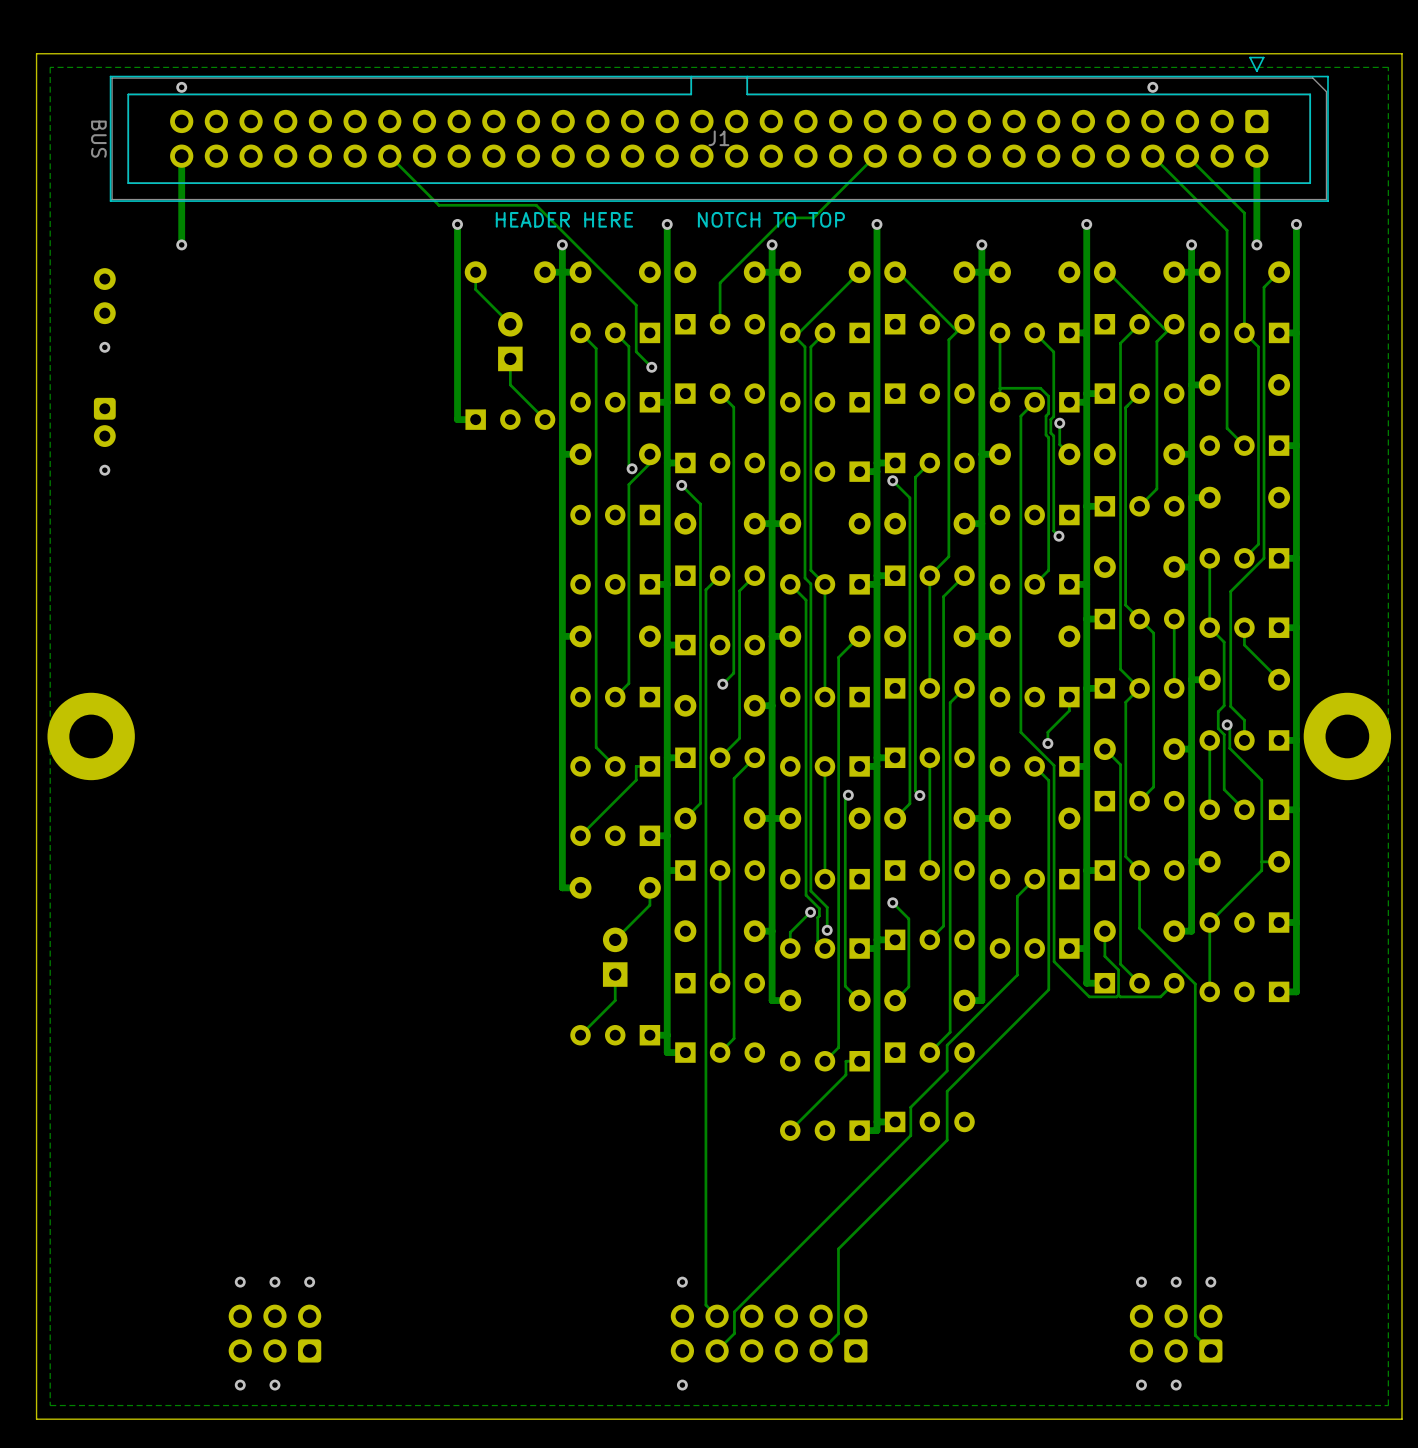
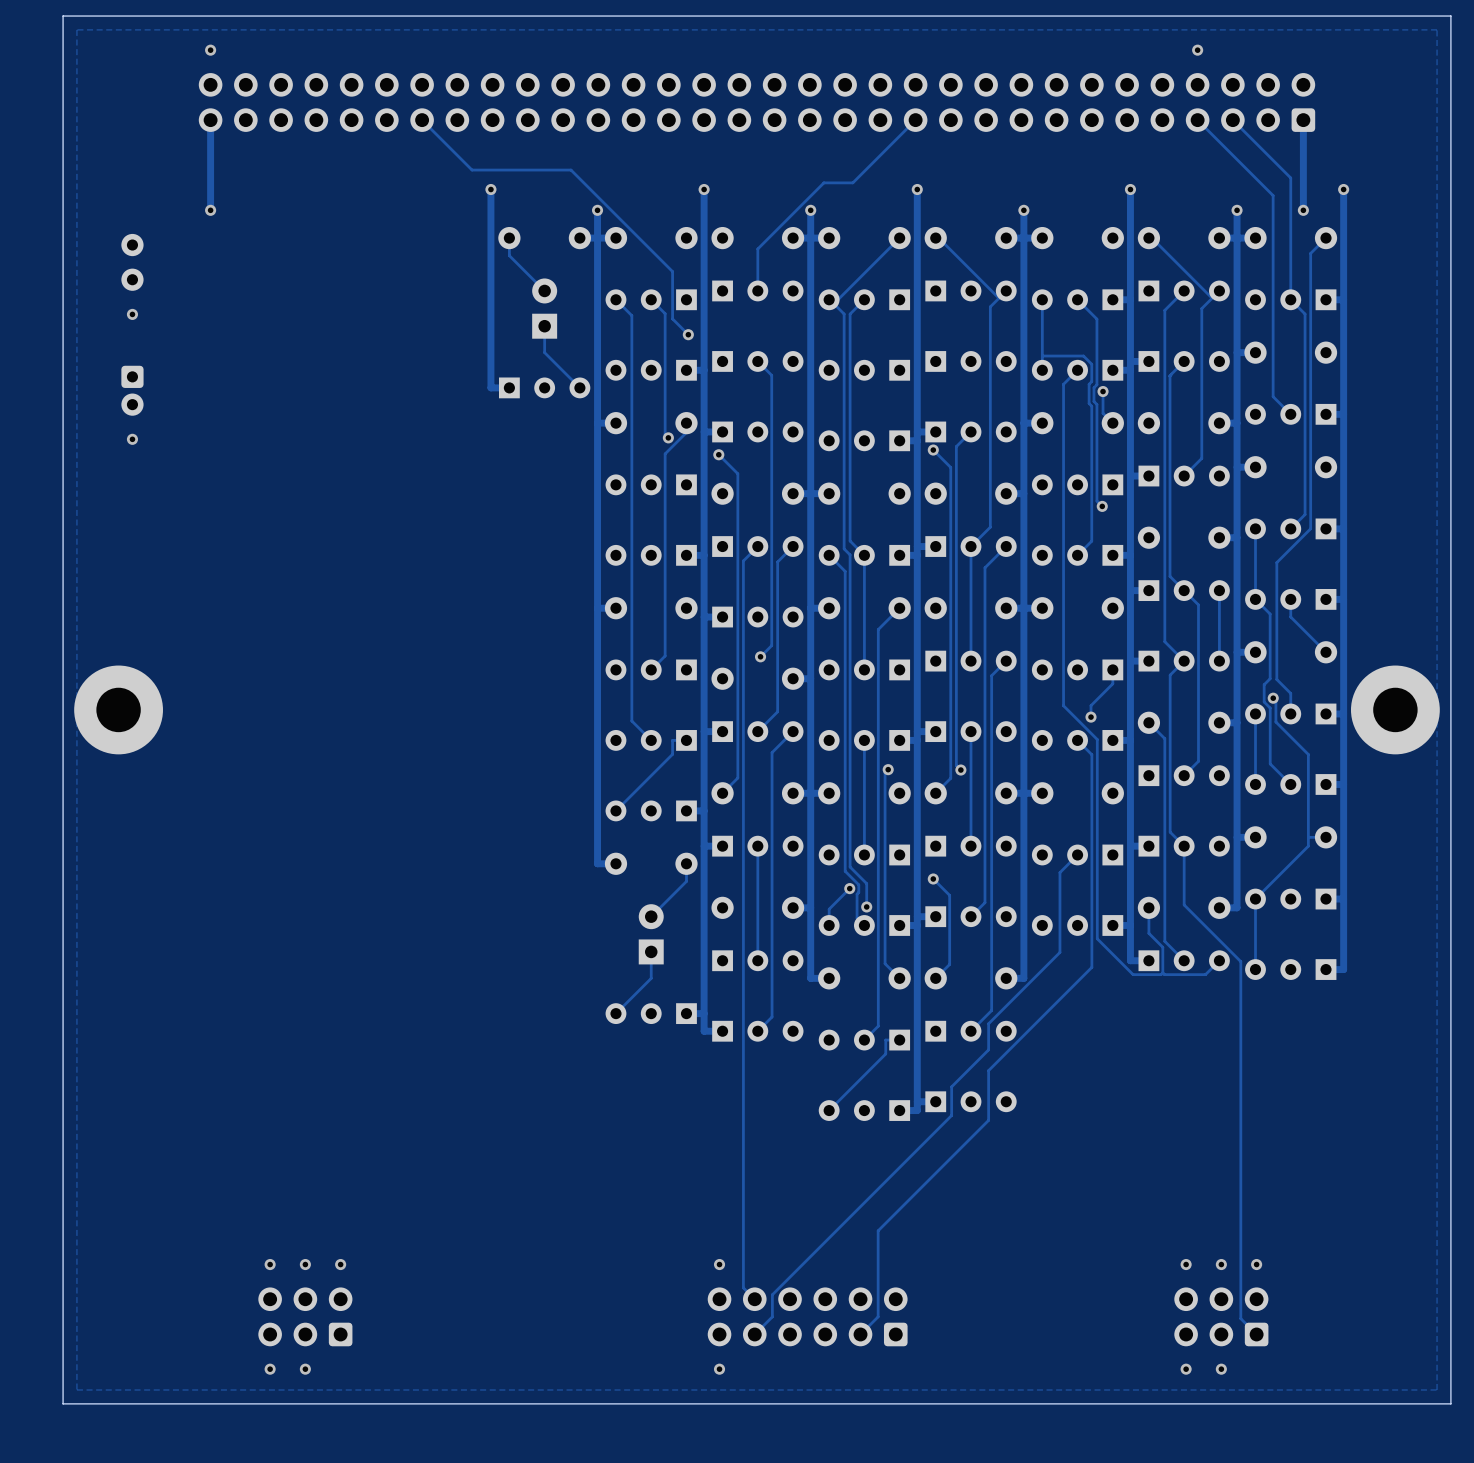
J1 side: bottom (719, 129) -> top (756, 102)
text: HEADER HERE (564, 219) -> none
text: NOTCH TO TOP (771, 219) -> none

